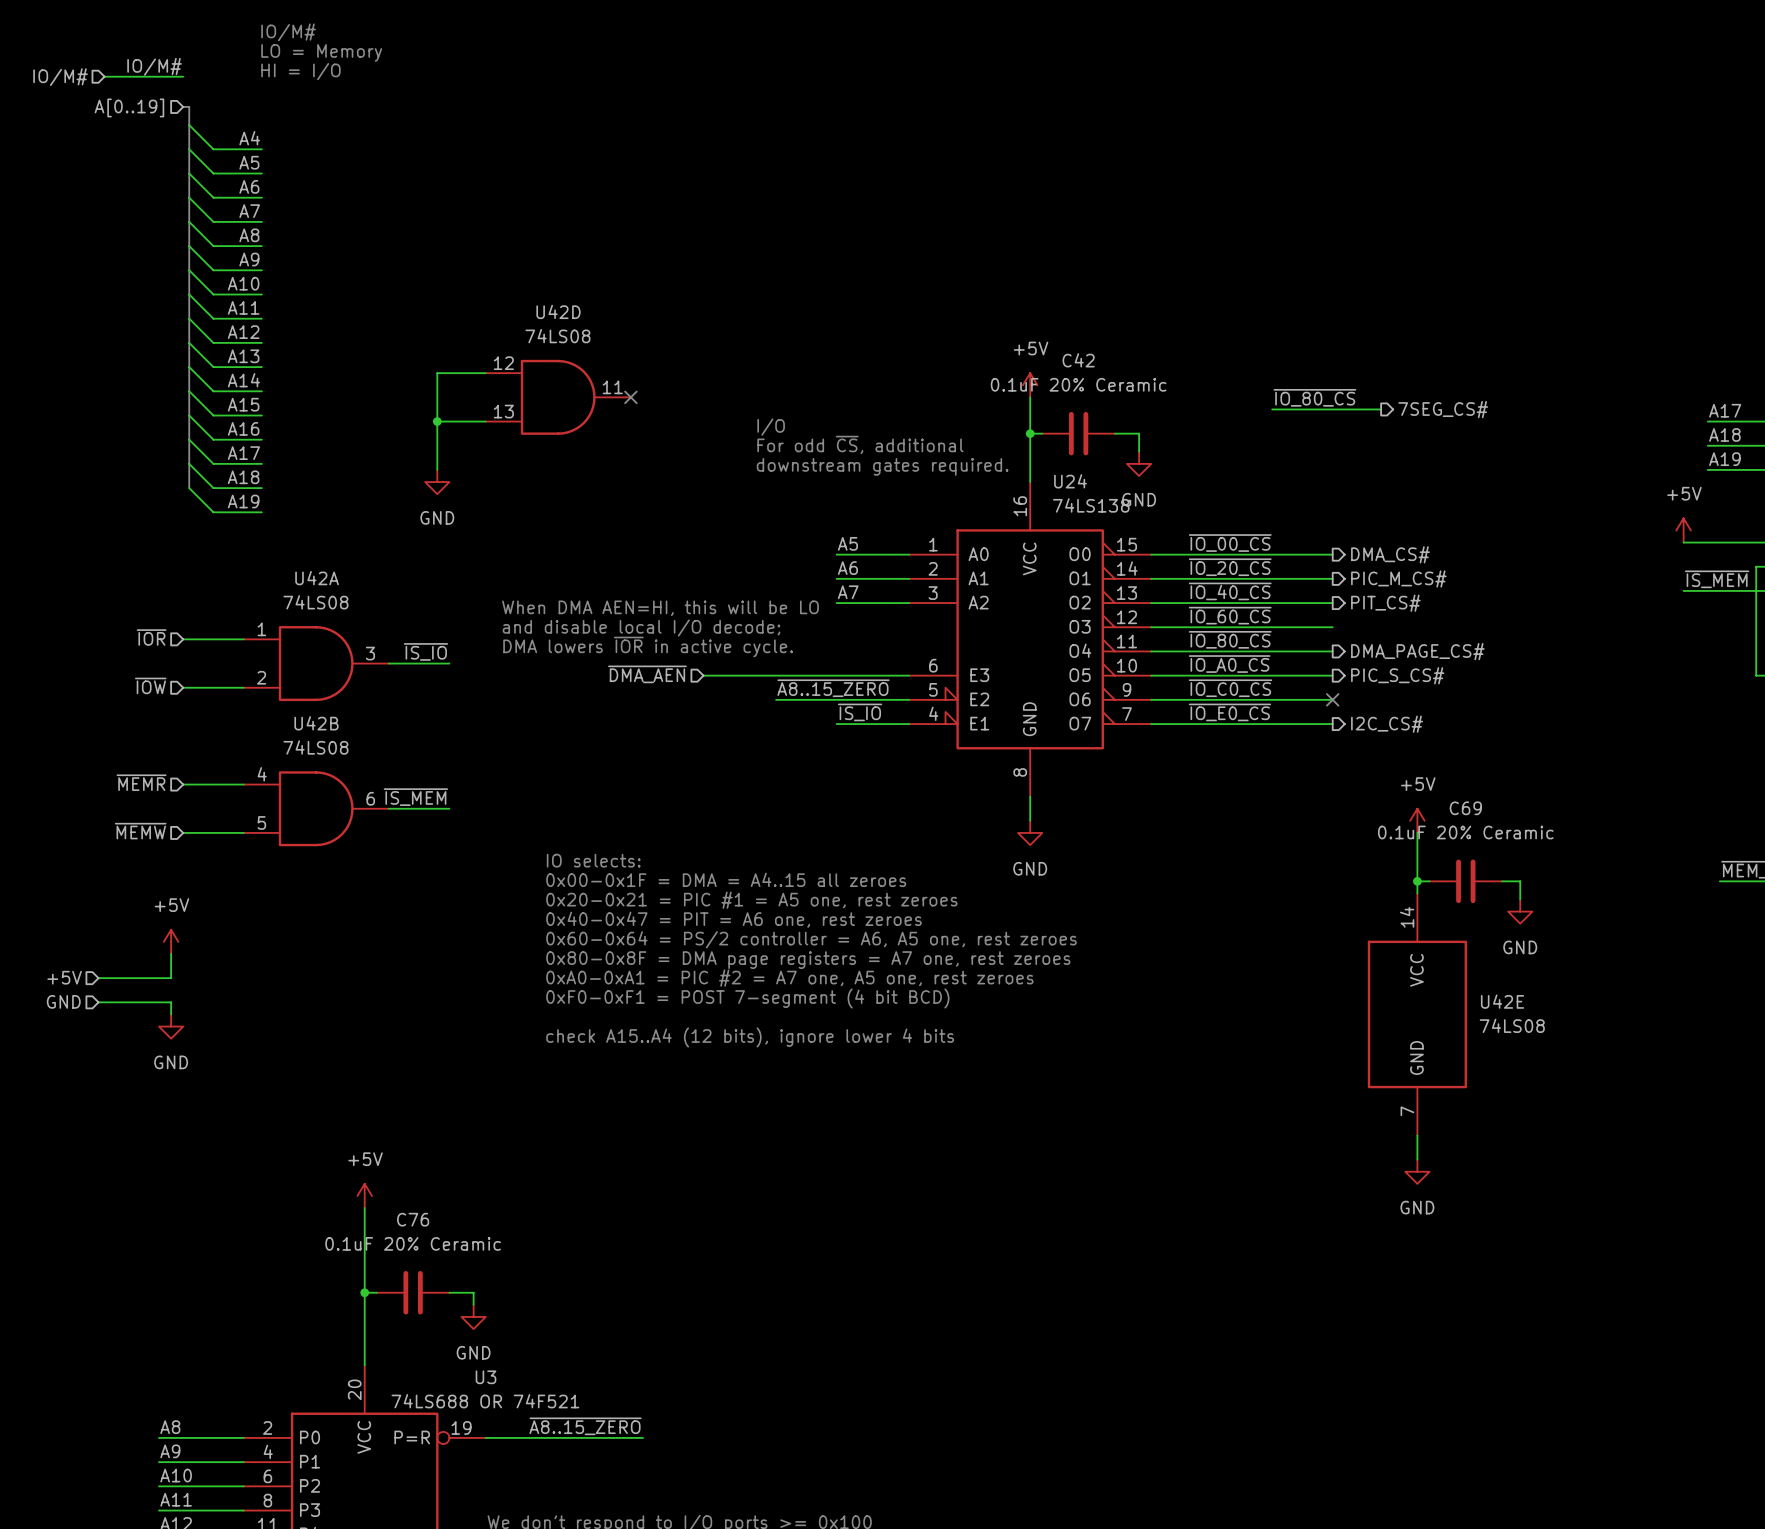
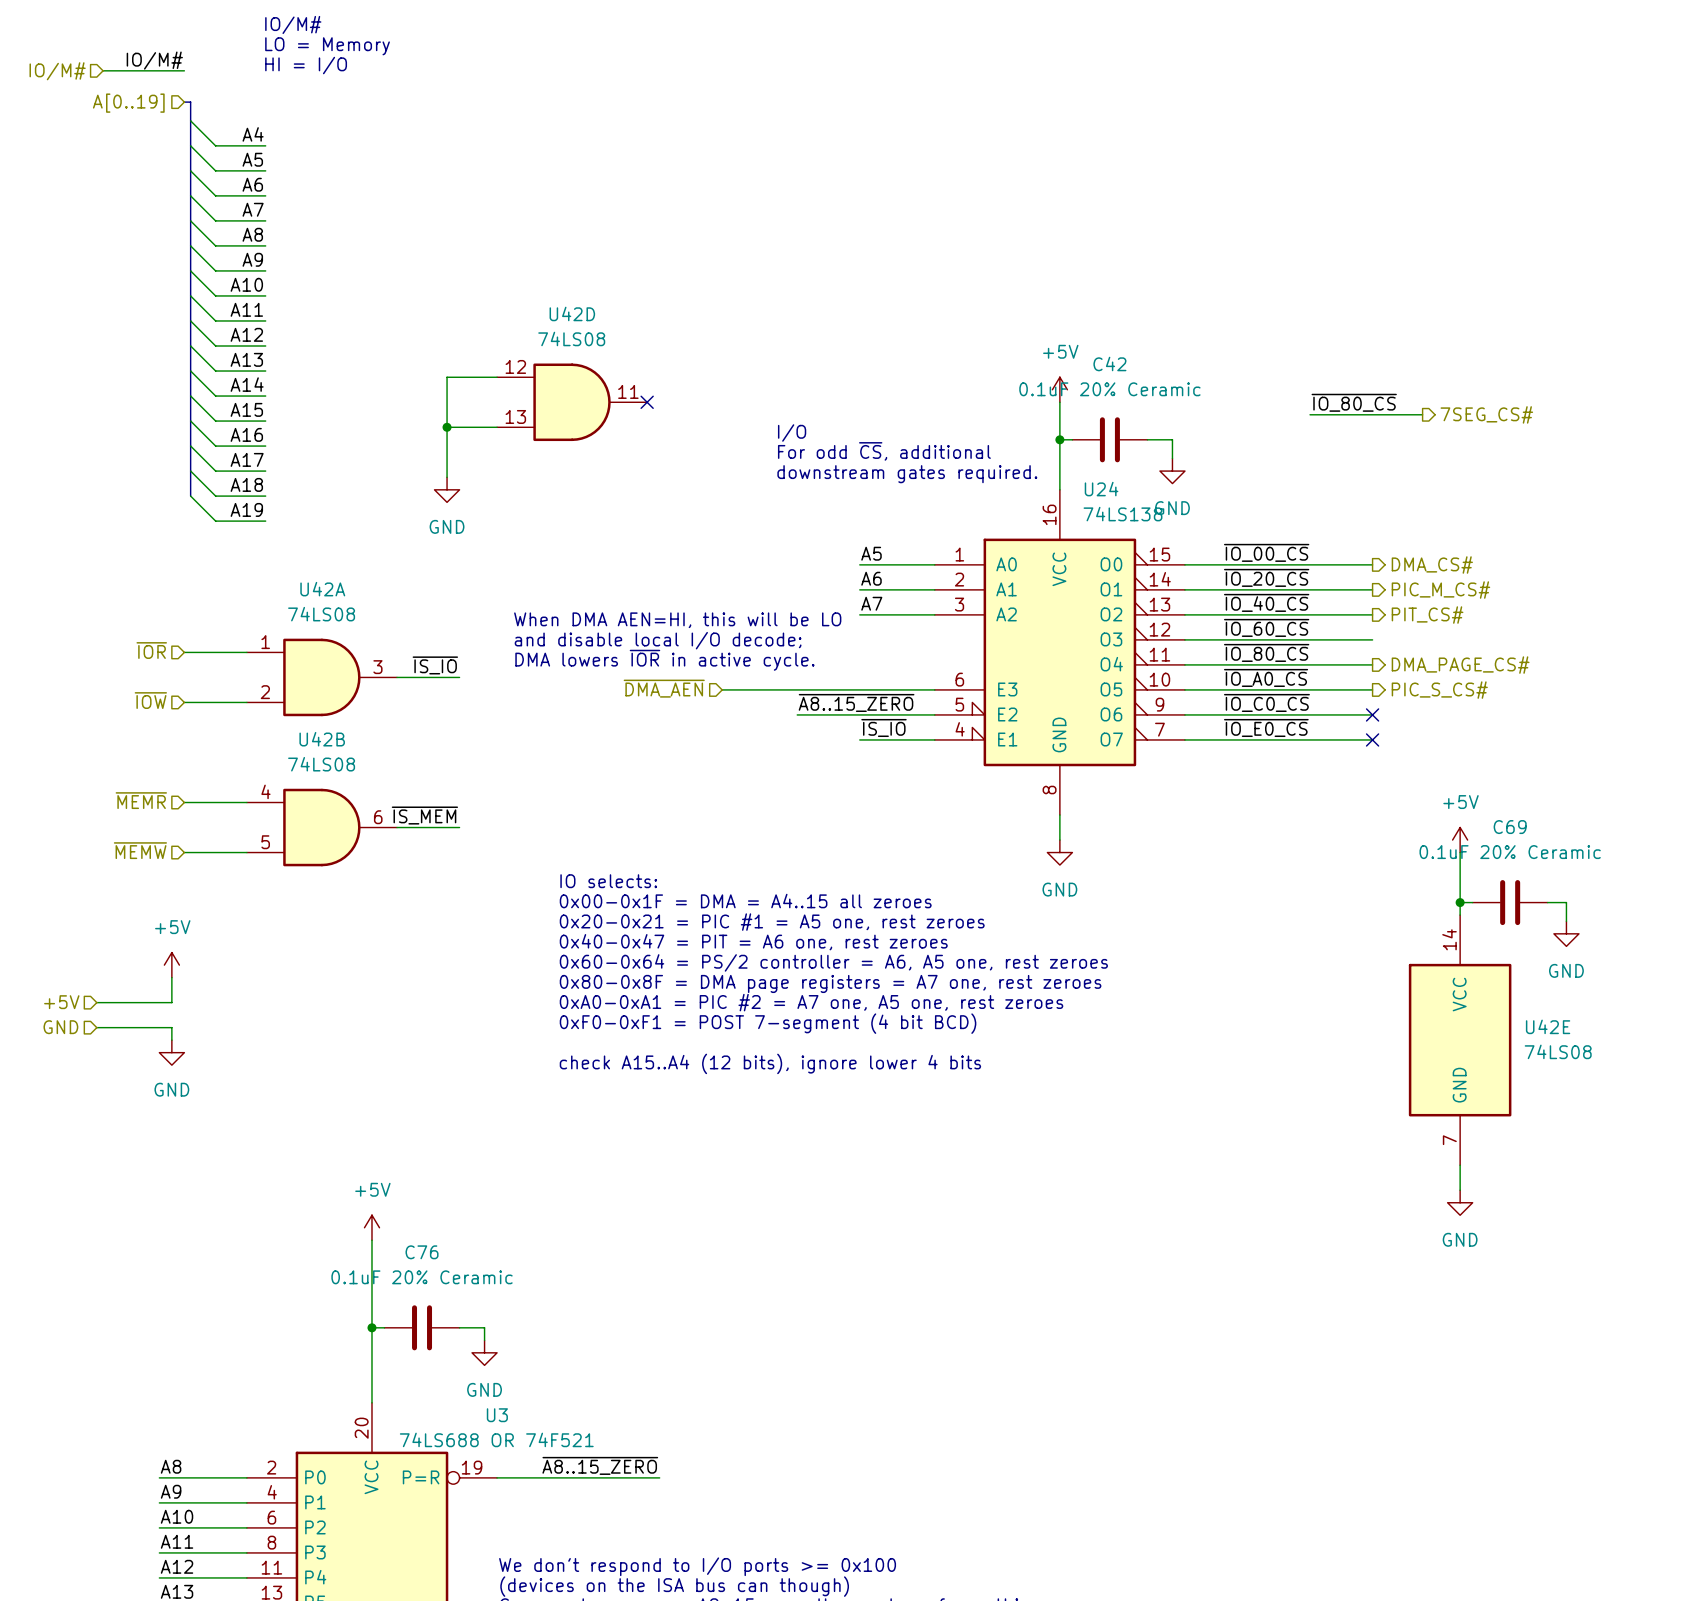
no-connect mark: none -> (1372, 739)
hierarchical label: I2C_CS# (1387, 724) -> none

